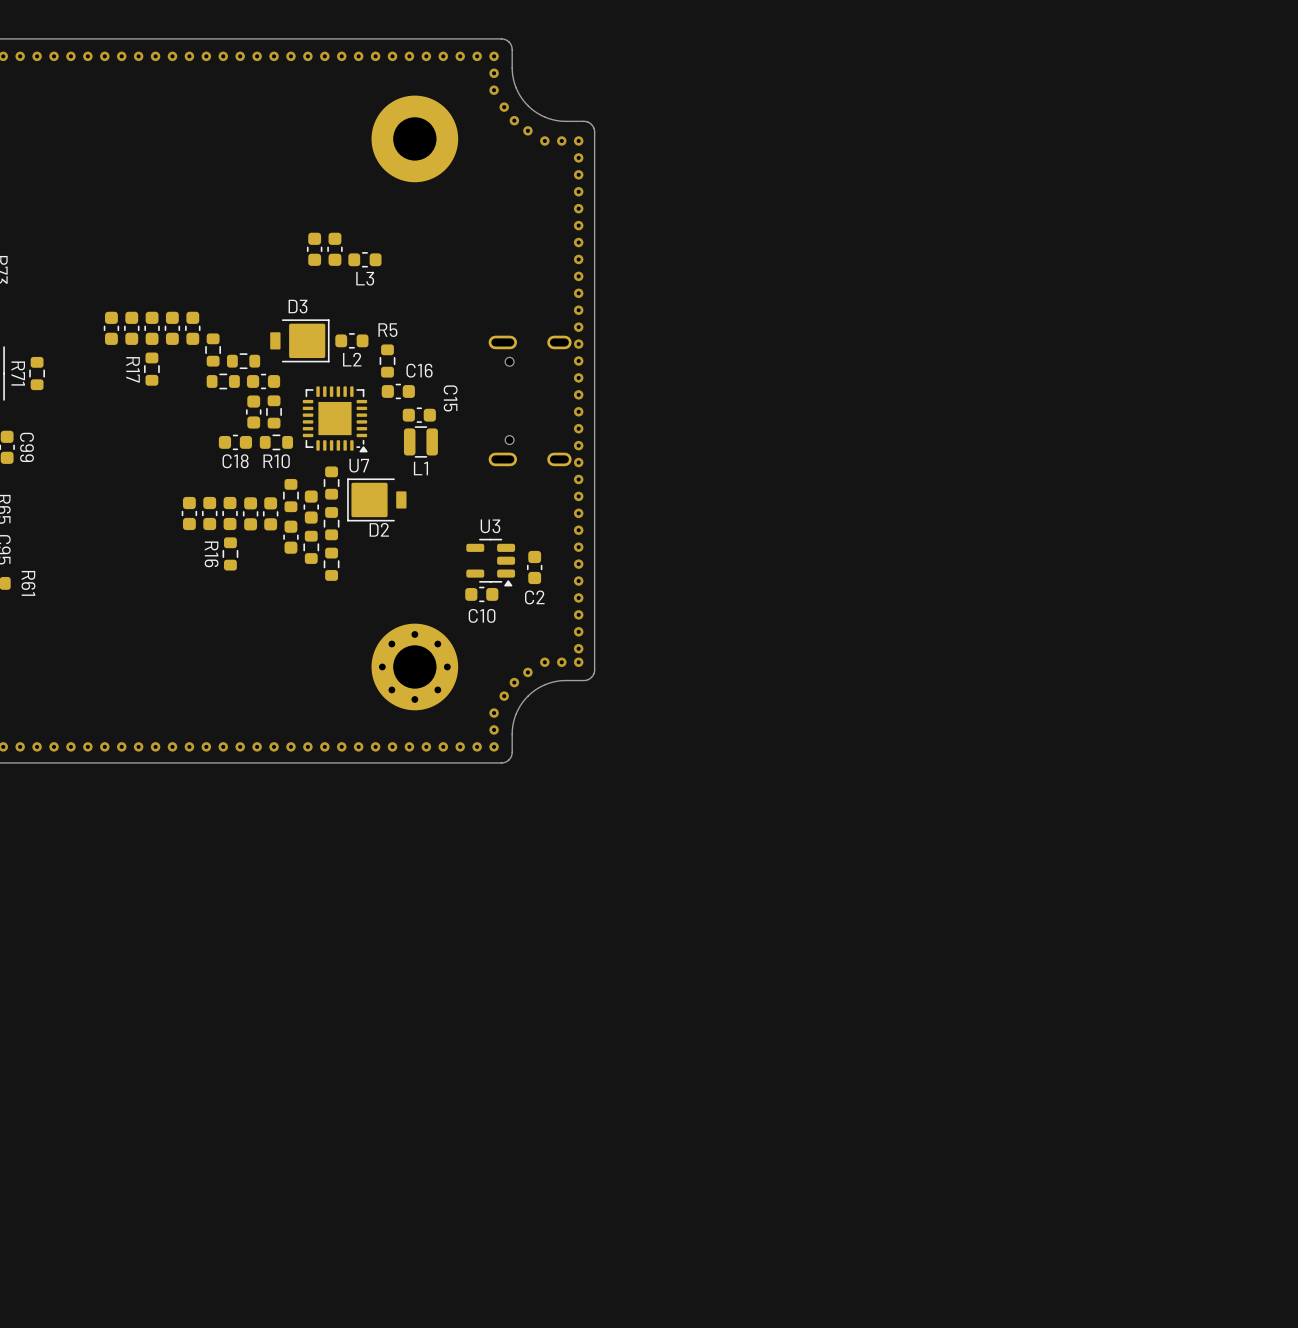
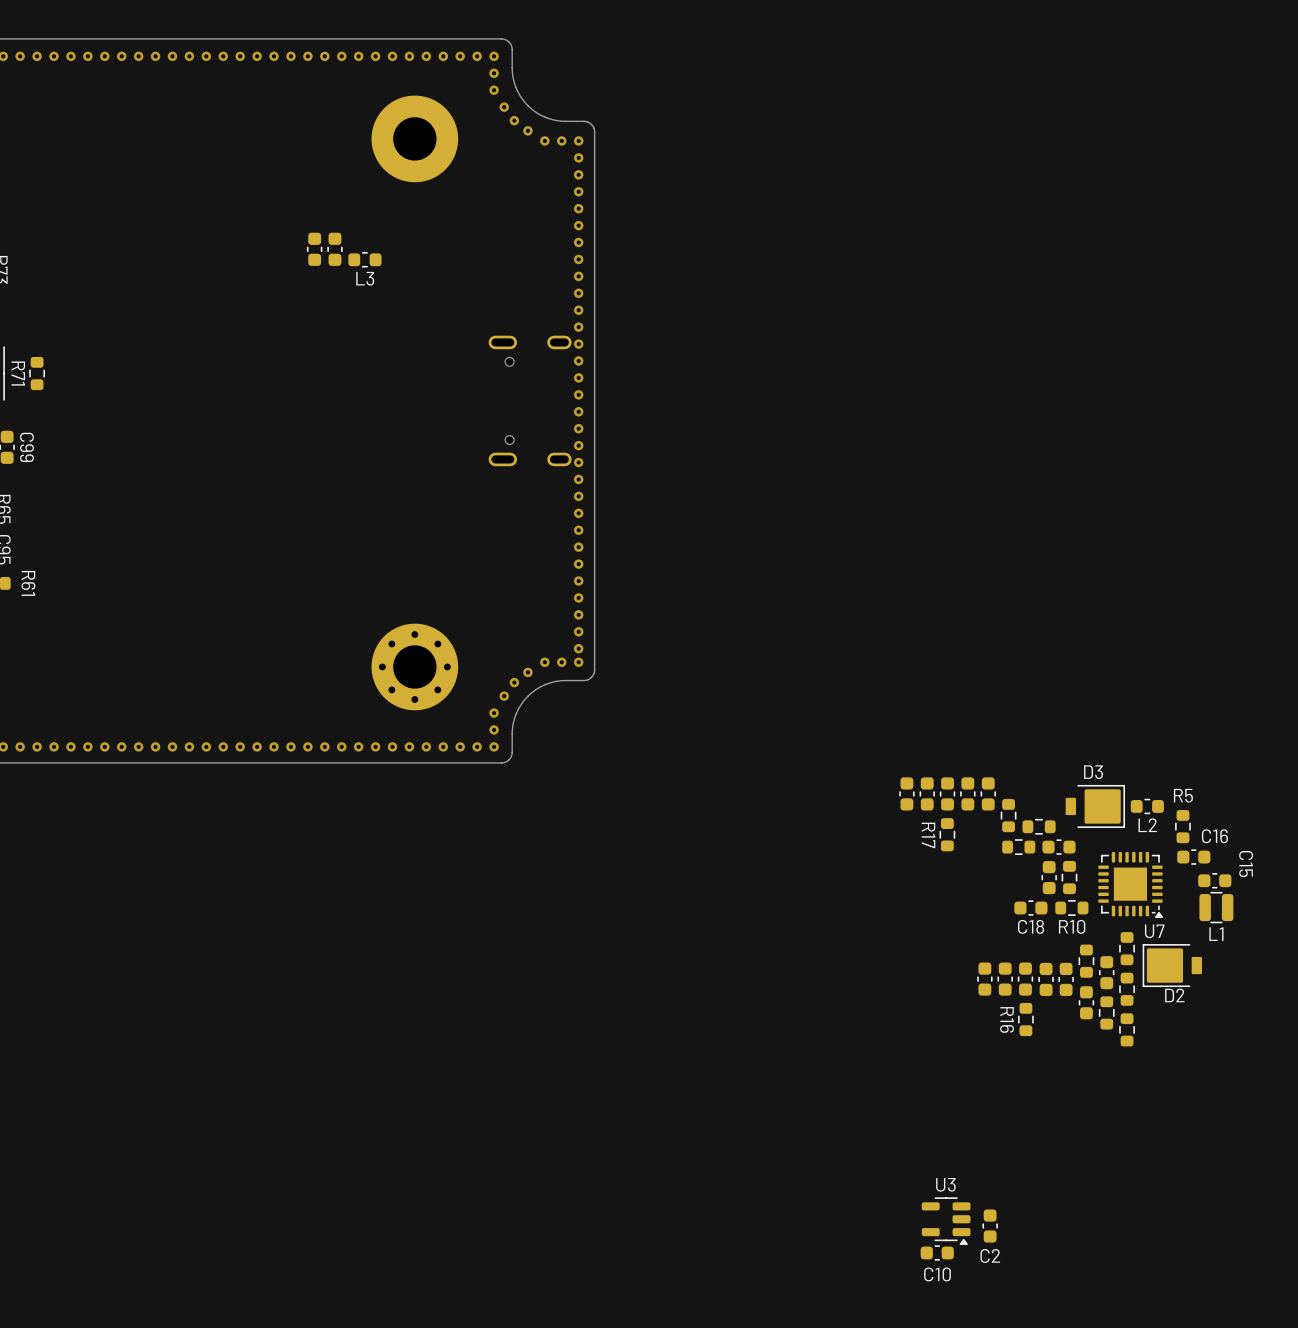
part: (111, 328) -> none
part: (131, 328) -> none
part: (152, 328) -> none
part: (172, 328) -> none
part: (192, 328) -> none
D3 position: (299, 340) -> (1095, 806)
L2 position: (351, 340) -> (1147, 806)
part: (213, 350) -> none
part: (243, 361) -> none
R5 position: (387, 361) -> (1182, 826)
R17 position: (151, 369) -> (947, 834)
part: (223, 381) -> none
part: (263, 381) -> none
C16 position: (398, 391) -> (1193, 857)
part: (274, 411) -> none
part: (253, 412) -> none
C15 position: (419, 415) -> (1214, 880)
U7 position: (335, 419) -> (1130, 884)
L1 position: (420, 441) -> (1216, 907)
C18 position: (235, 442) -> (1030, 908)
R10 position: (276, 442) -> (1071, 908)
part: (331, 483) -> none
part: (290, 495) -> none
D2 position: (376, 499) -> (1172, 965)
part: (311, 507) -> none
part: (189, 513) -> none
part: (209, 513) -> none
part: (230, 513) -> none
part: (250, 513) -> none
part: (270, 513) -> none
part: (331, 523) -> none
part: (290, 537) -> none
part: (311, 547) -> none
R16 position: (230, 553) -> (1025, 1019)
U3 position: (490, 562) -> (946, 1221)
part: (331, 564) -> none
C2 position: (534, 567) -> (990, 1226)
C10 position: (481, 594) -> (937, 1252)
part: none -> (906, 793)
part: none -> (927, 793)
part: none -> (947, 793)
part: none -> (967, 793)
part: none -> (988, 793)
part: none -> (1008, 815)
part: none -> (1039, 826)
part: none -> (1018, 847)
part: none -> (1059, 847)
part: none -> (1049, 877)
part: none -> (1069, 877)
part: none -> (1127, 948)
part: none -> (1086, 961)
part: none -> (1106, 972)
part: none -> (984, 979)
part: none -> (1005, 979)
part: none -> (1025, 979)
part: none -> (1046, 979)
part: none -> (1066, 979)
part: none -> (1127, 989)
part: none -> (1086, 1002)
part: none -> (1106, 1012)
part: none -> (1127, 1029)

